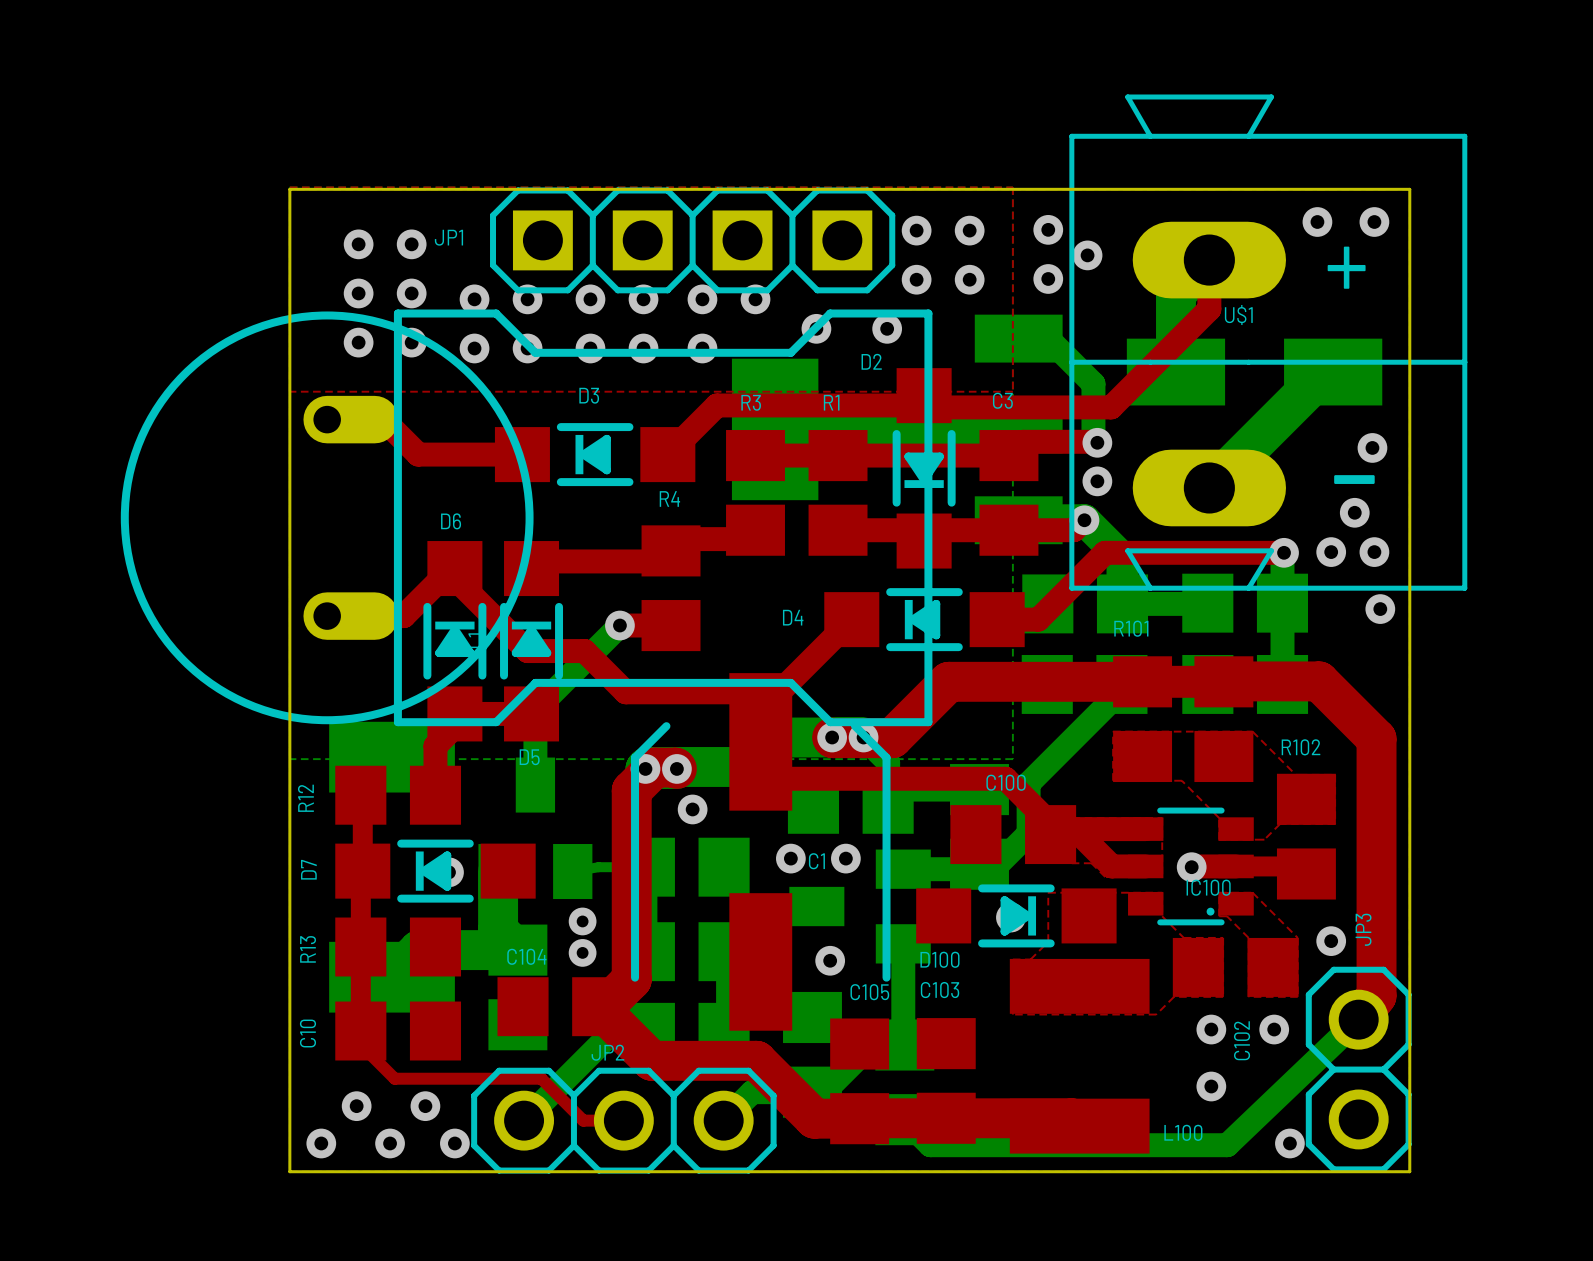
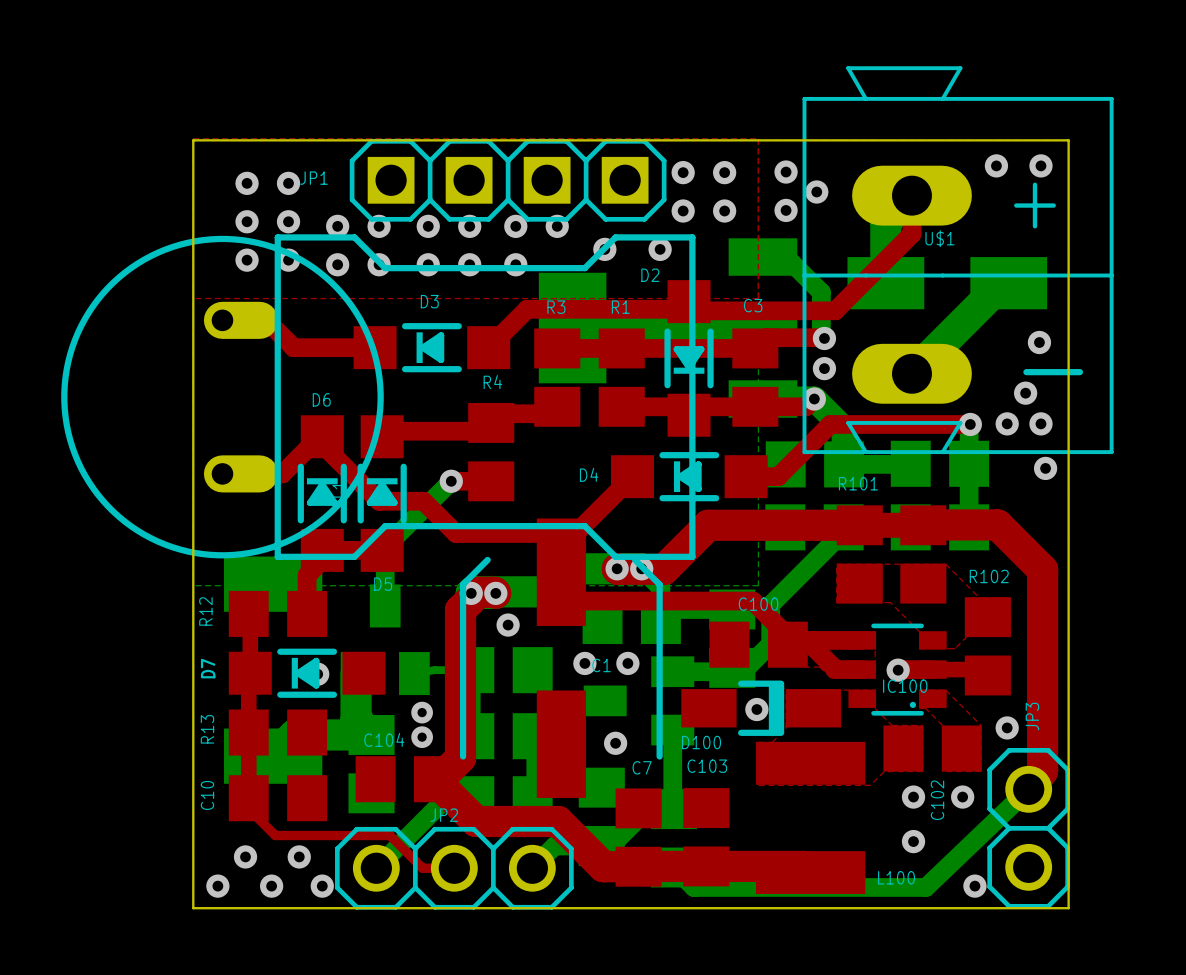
D100 footprint: [916, 884, 1117, 948] -> [681, 680, 841, 736]
C105 name: C105 (869, 992) -> C7 (642, 767)

